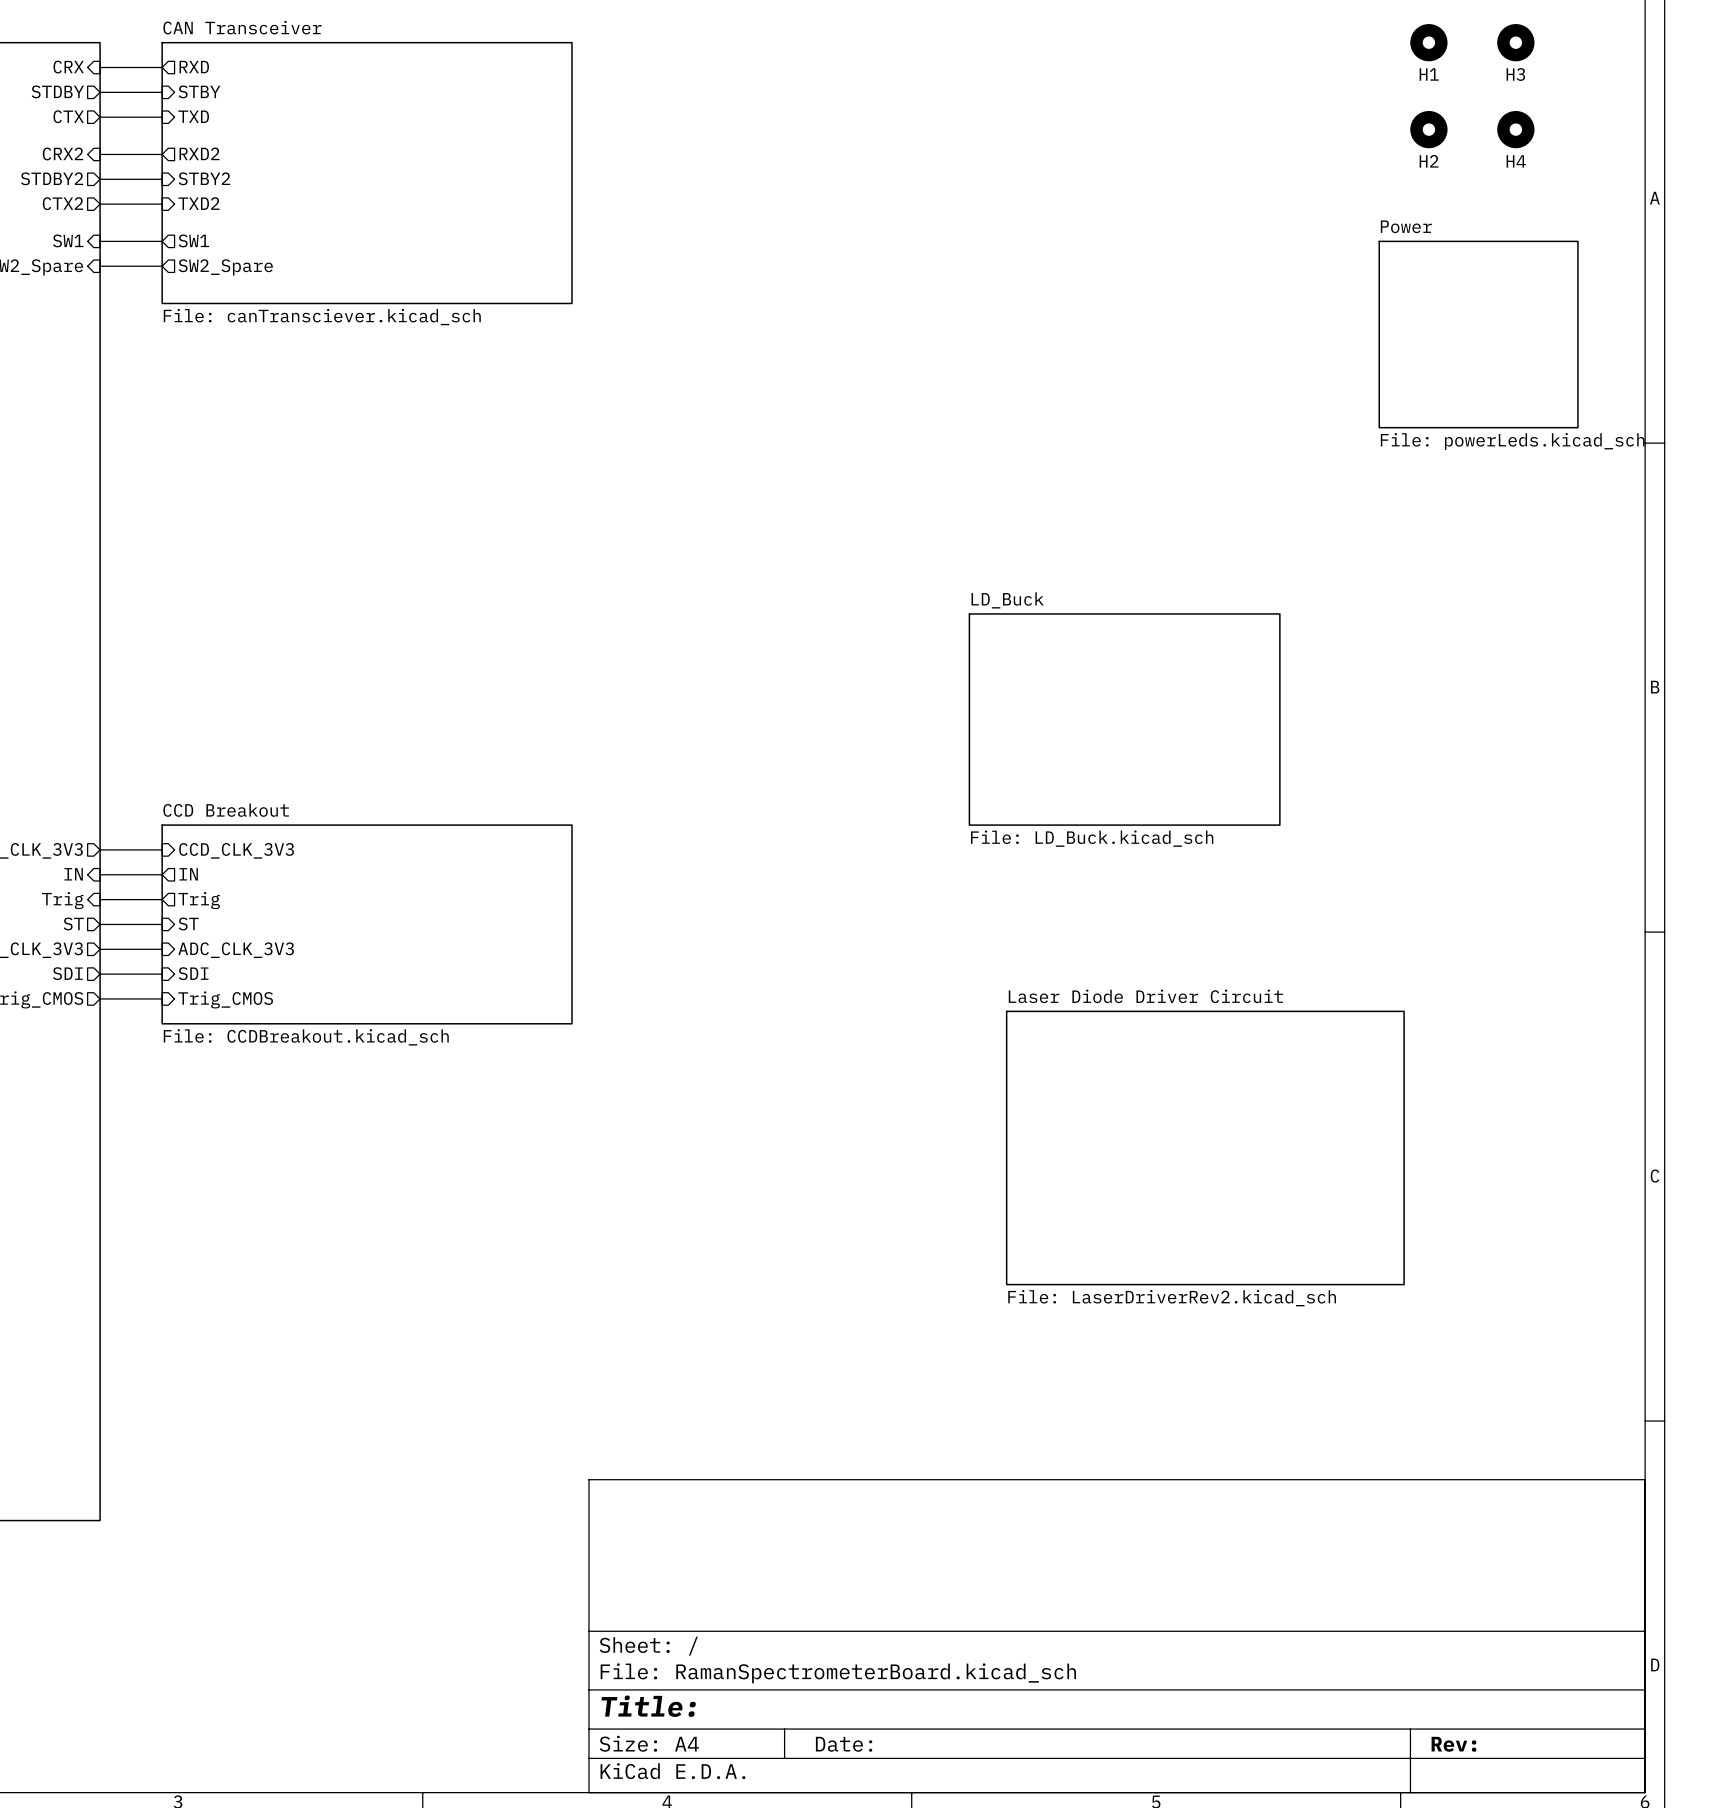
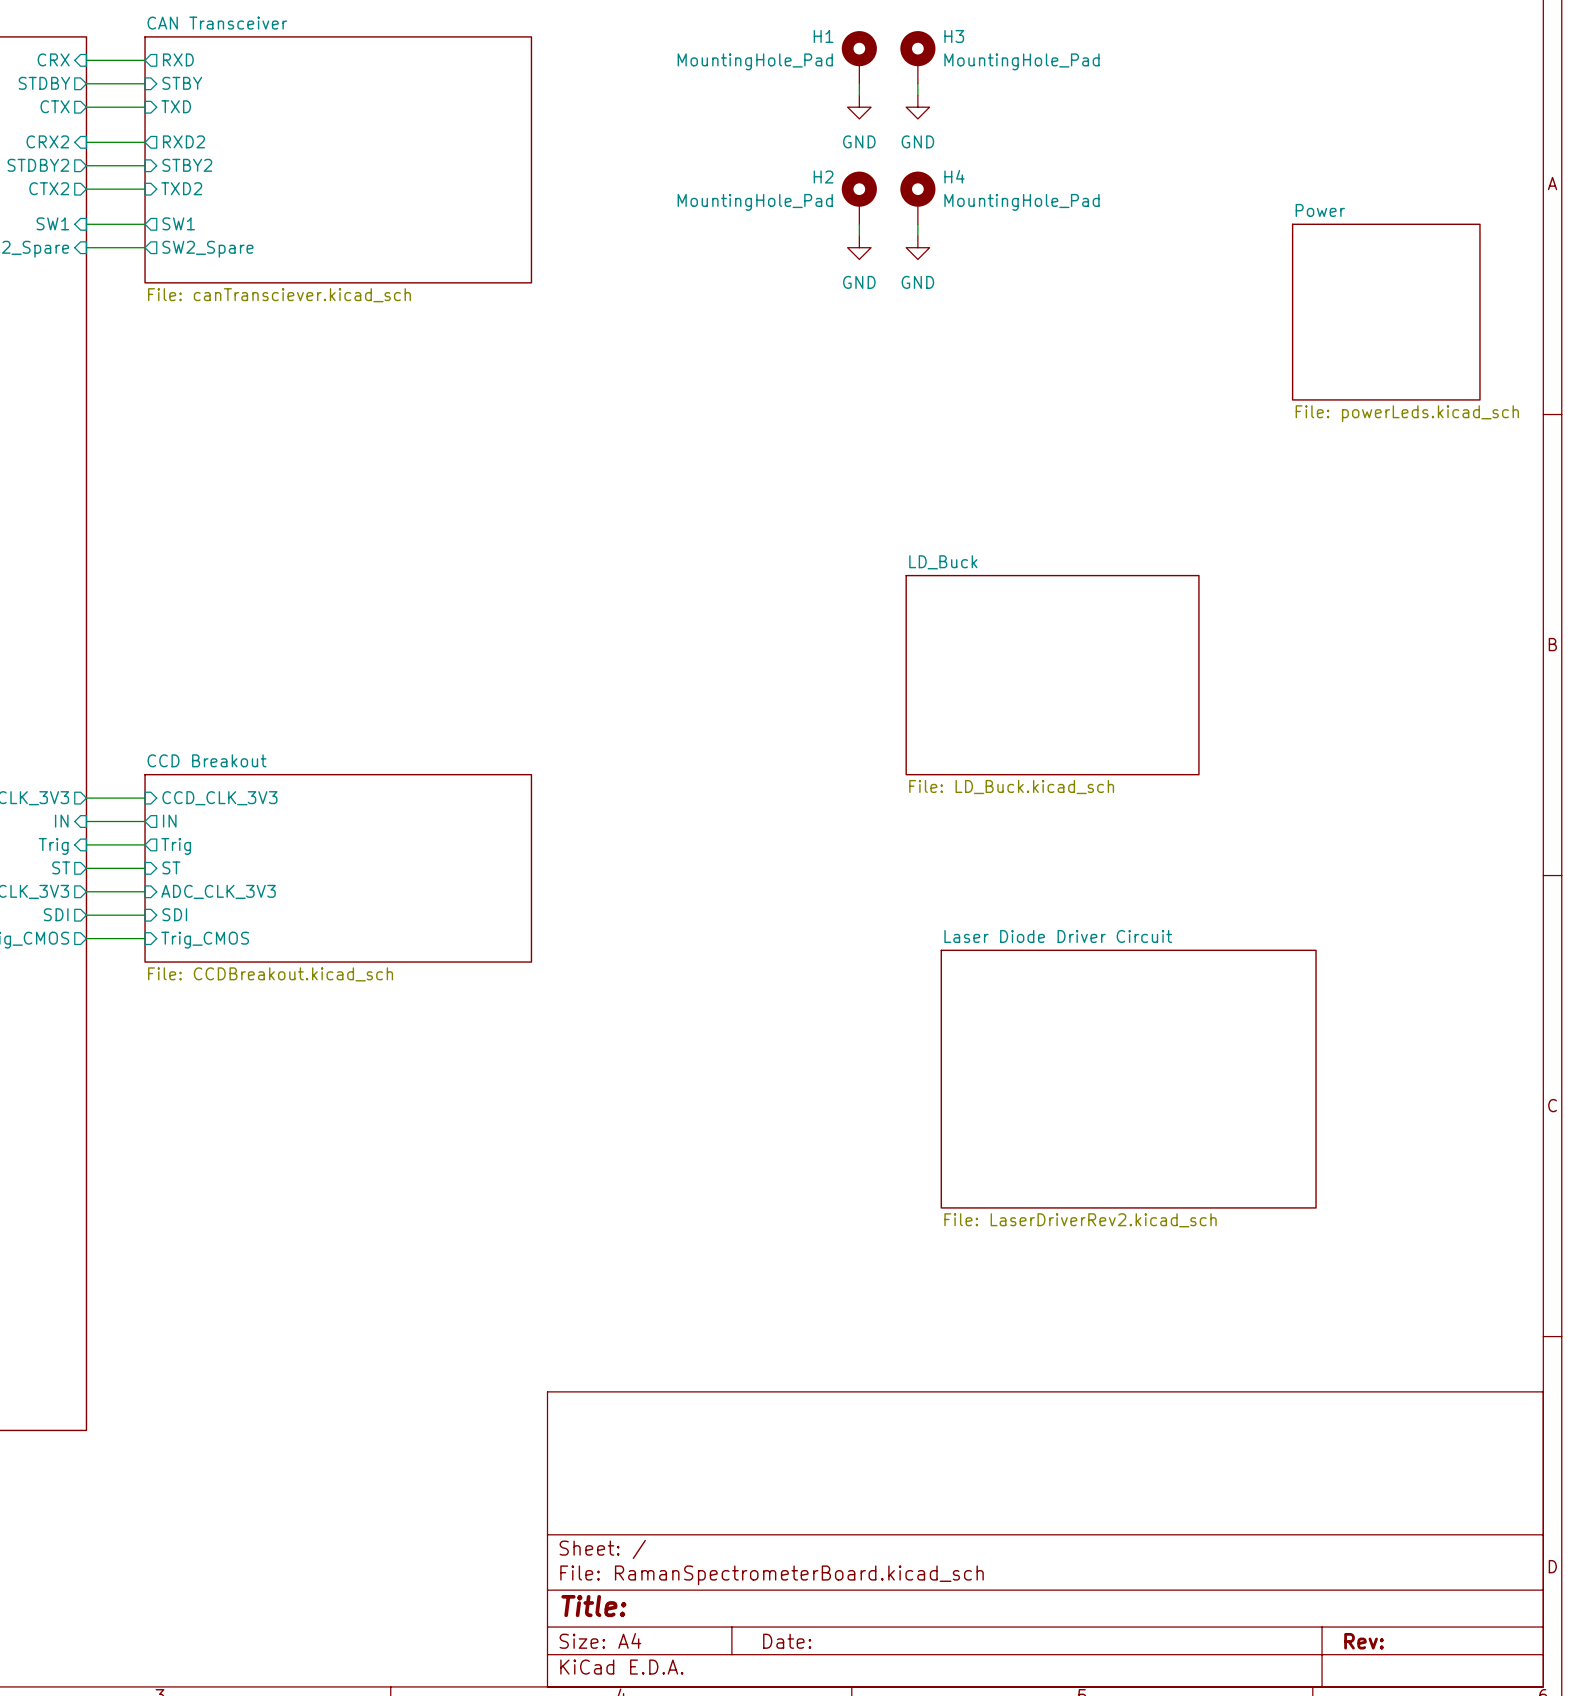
H1 symbol: [1410, 24, 1448, 62] -> [841, 31, 877, 84]
H3 symbol: [1497, 24, 1535, 62] -> [900, 31, 936, 84]
H1 value: none -> MountingHole_Pad (755, 61)
H3 value: none -> MountingHole_Pad (1021, 61)
H1 name position: H1 (1429, 74) -> H1 (823, 36)
H3 name position: H3 (1515, 74) -> H3 (954, 36)
wire: none -> (859, 83) (859, 95)
wire: none -> (917, 83) (917, 95)
H2 symbol: [1410, 110, 1448, 149] -> [841, 171, 877, 225]
H4 symbol: [1497, 110, 1535, 149] -> [900, 171, 936, 225]
power symbol: none -> GND (859, 107)
power symbol: none -> GND (917, 107)
H2 name position: H2 (1429, 161) -> H2 (823, 177)
H4 name position: H4 (1516, 161) -> H4 (954, 176)
H2 value: none -> MountingHole_Pad (755, 202)
H4 value: none -> MountingHole_Pad (1021, 202)
wire: none -> (859, 224) (859, 236)
wire: none -> (917, 224) (917, 236)
power symbol: none -> GND (859, 247)
power symbol: none -> GND (917, 247)

